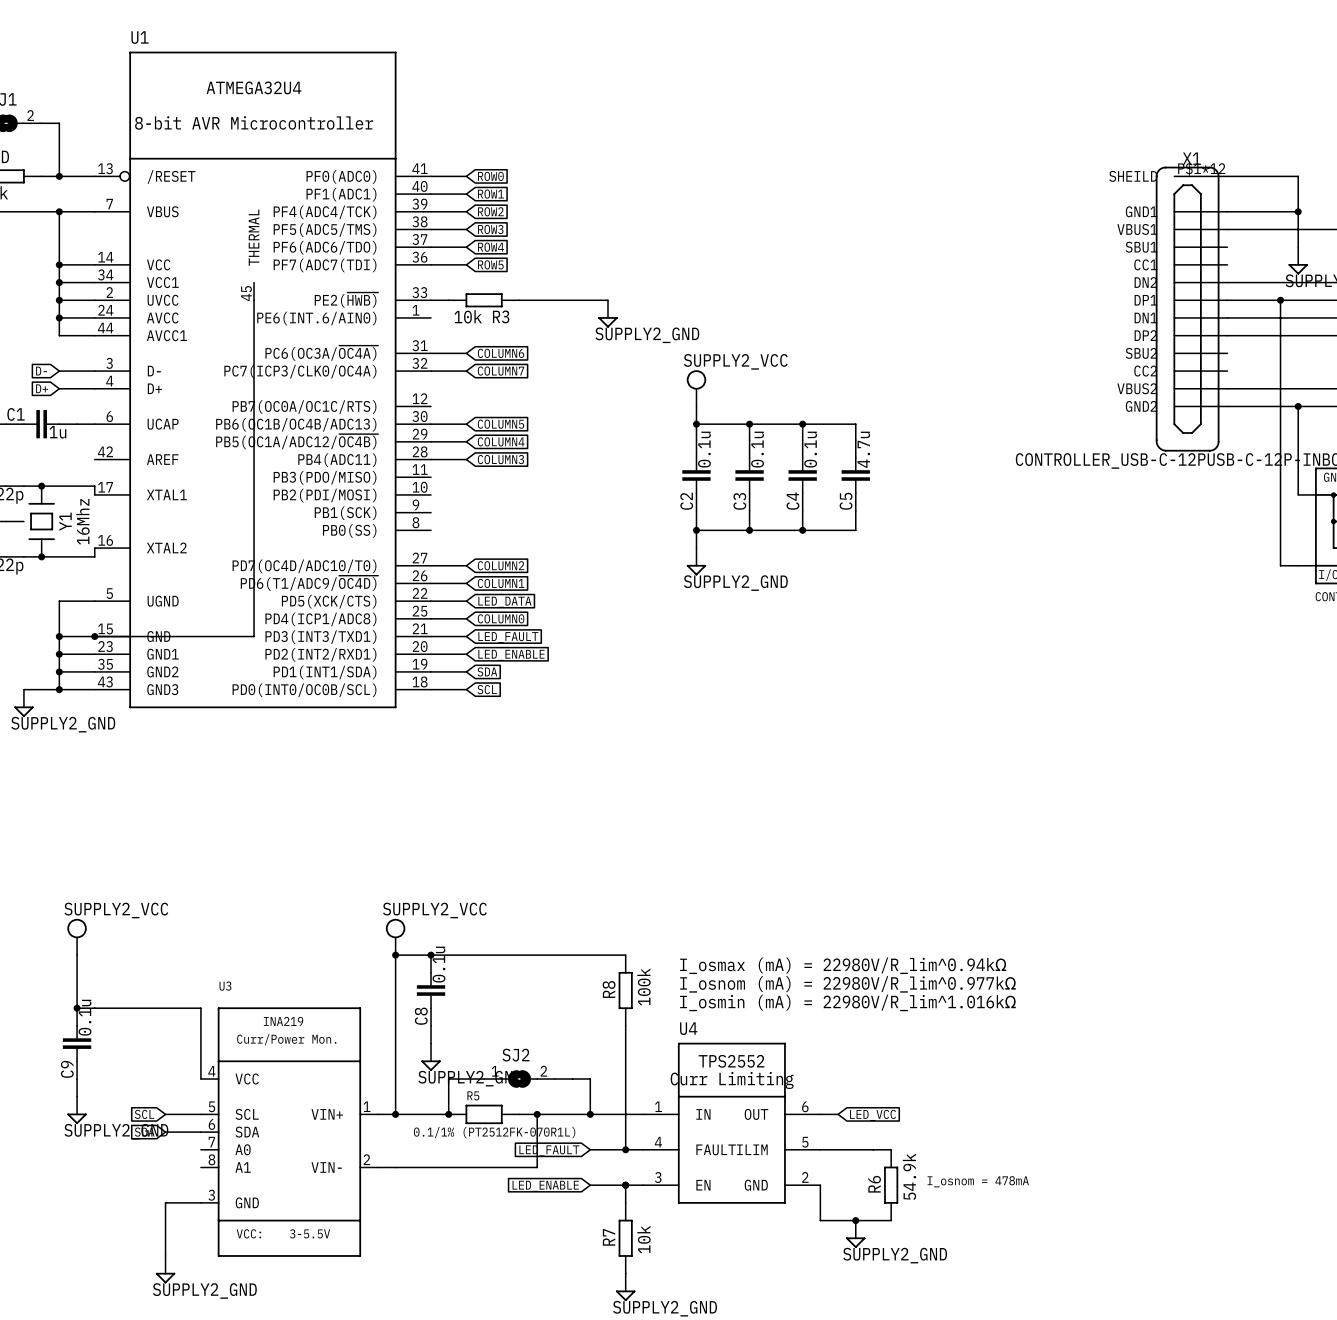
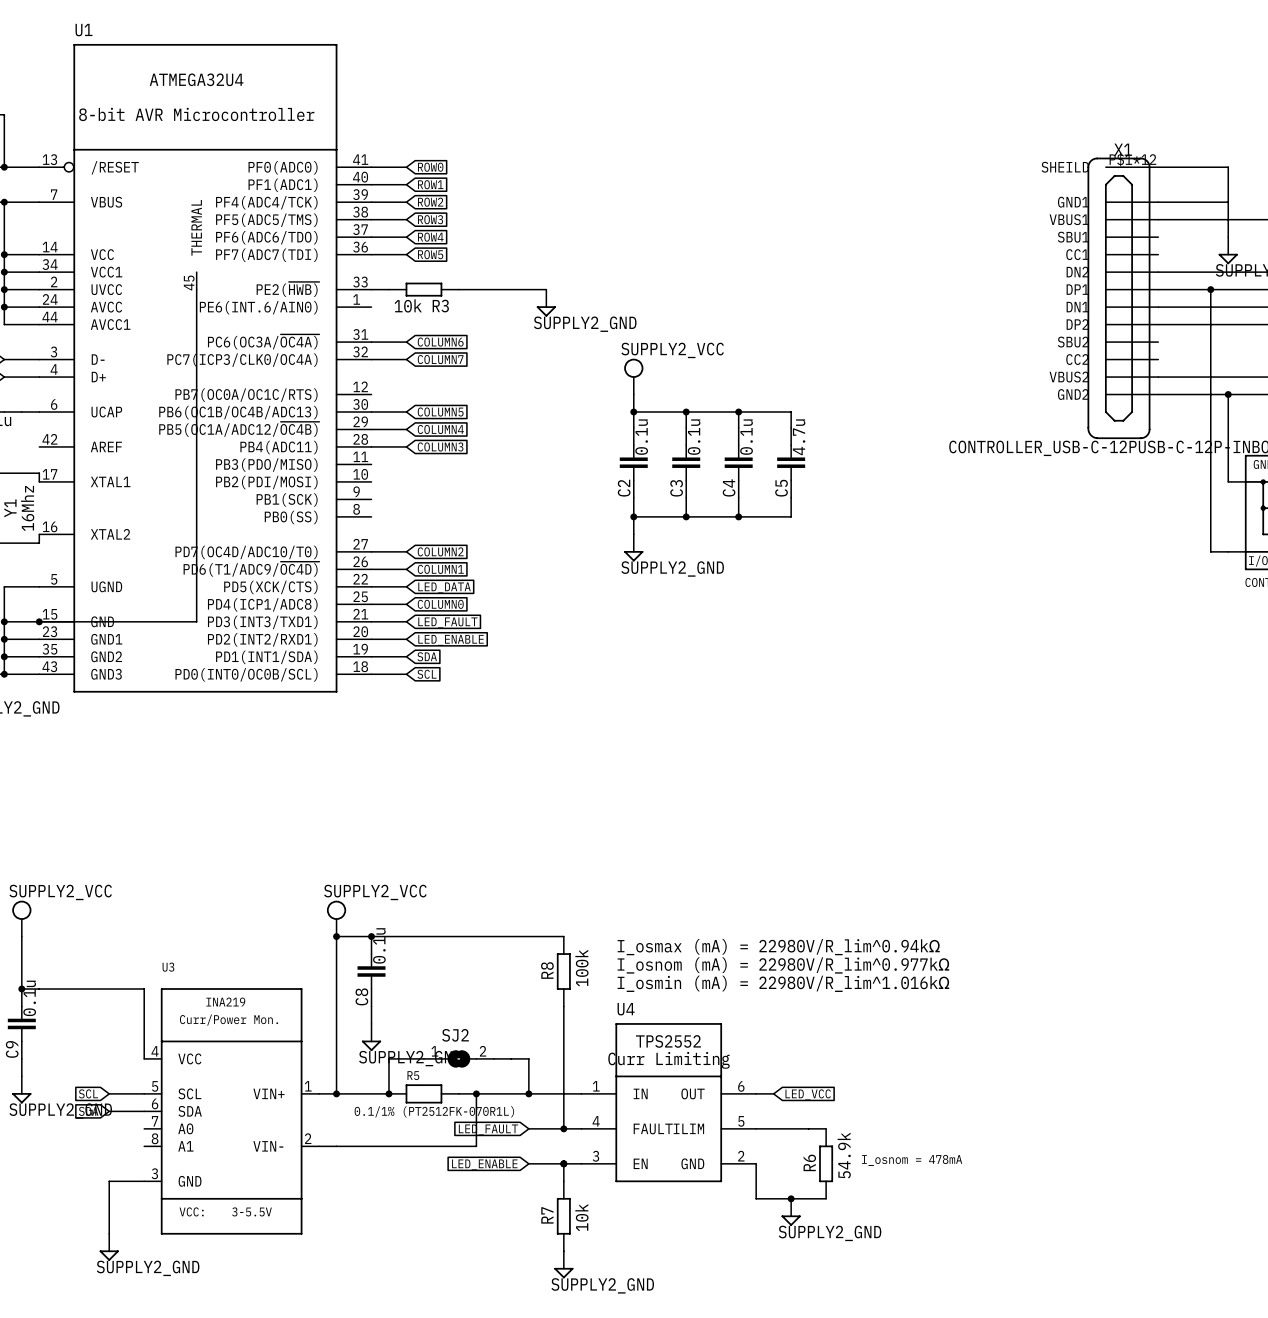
junction: (1298, 211) -> none

